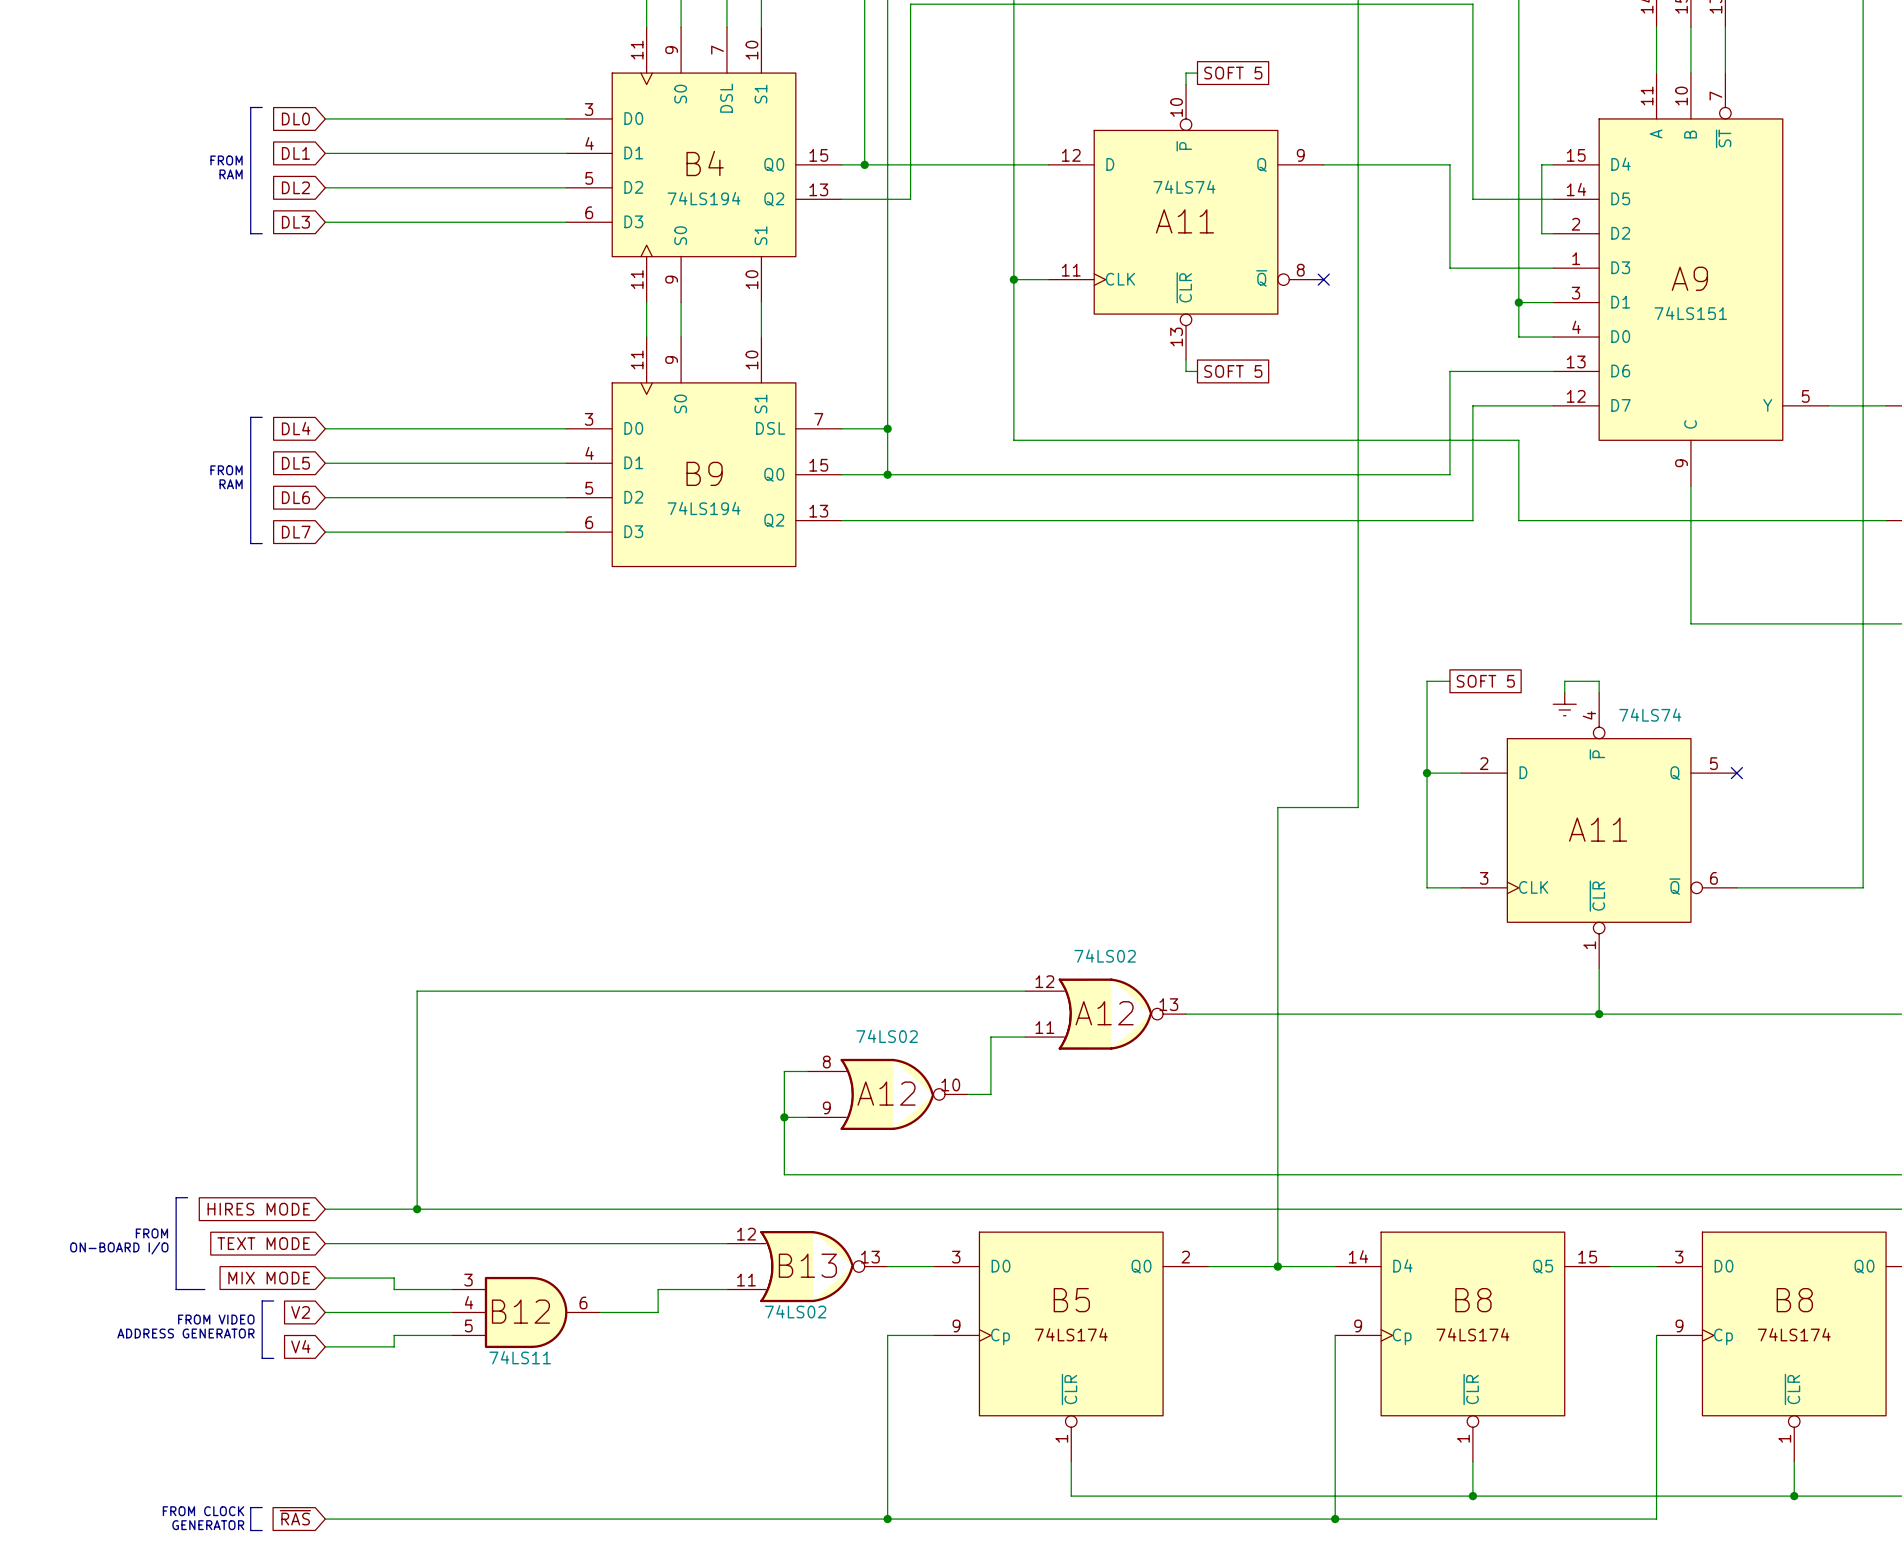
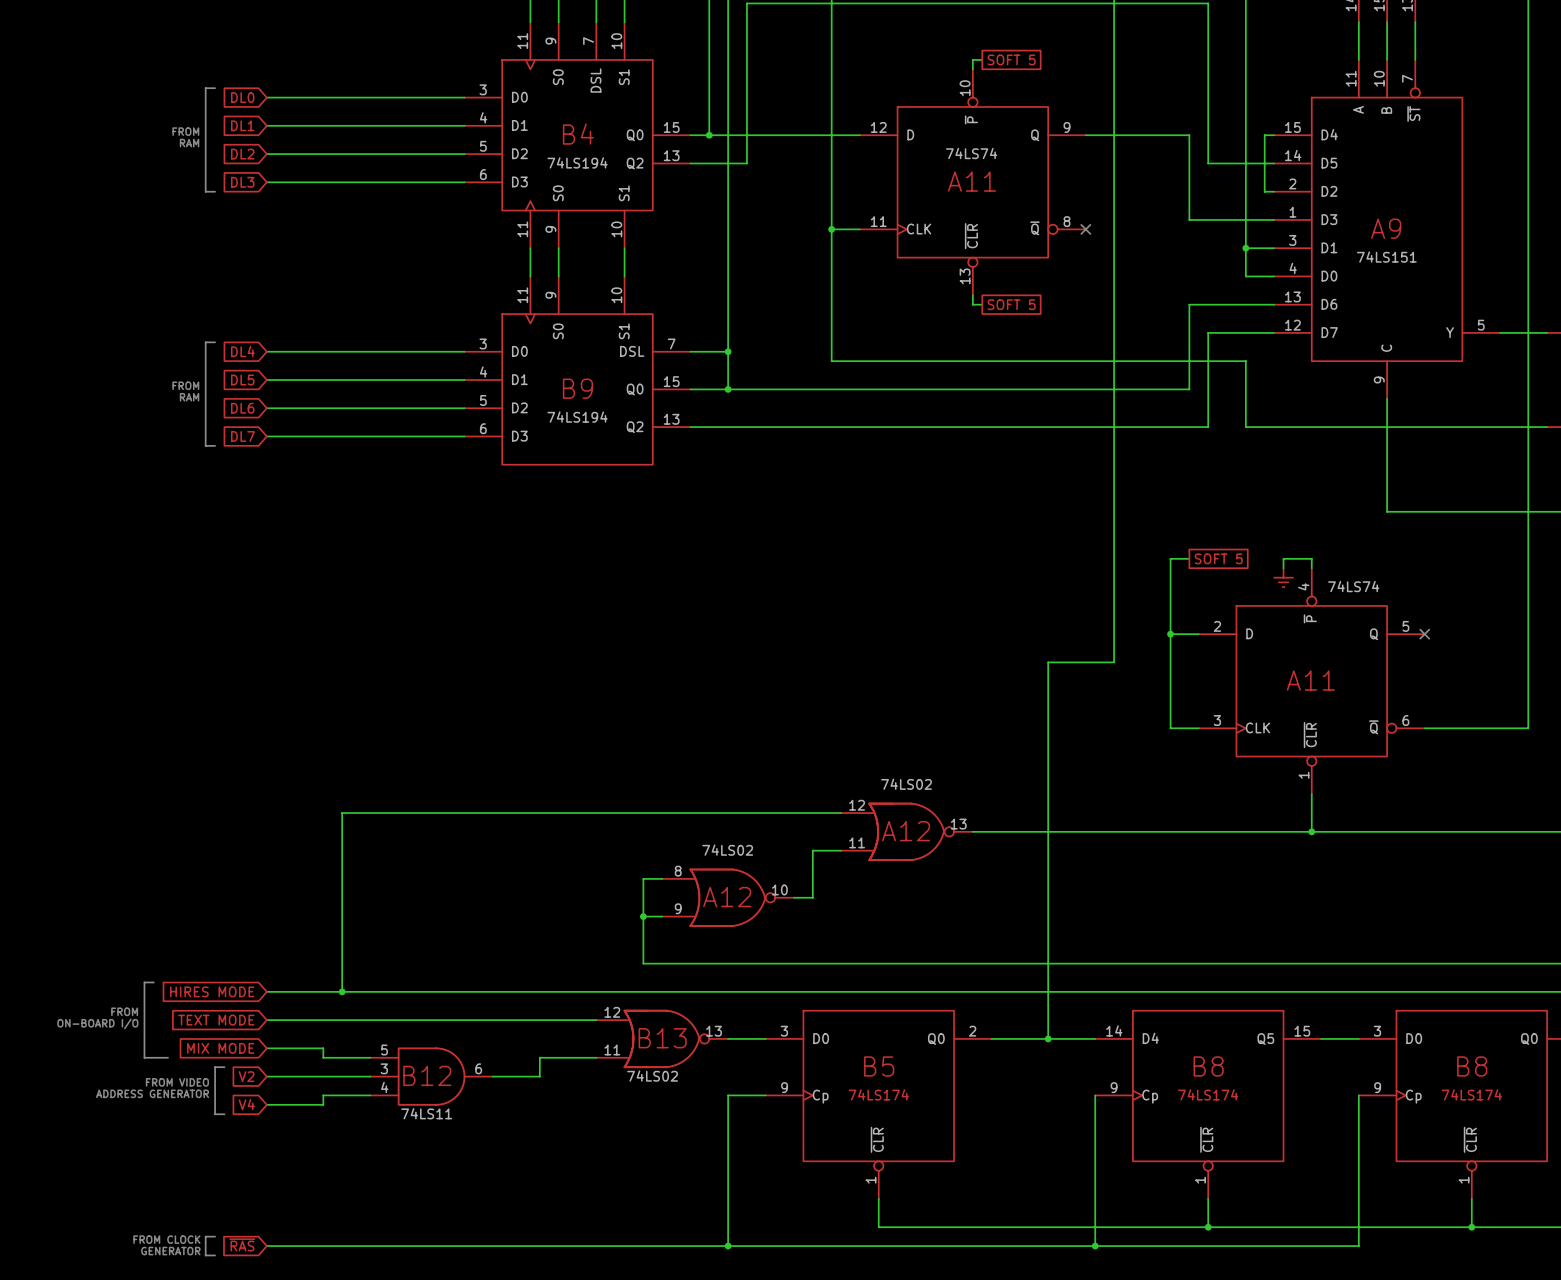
part pin number: 3 (468, 1280) -> 5 (384, 1050)
part pin number: 4 (469, 1302) -> 3 (384, 1068)
part pin number: 5 (468, 1325) -> 4 (384, 1087)

